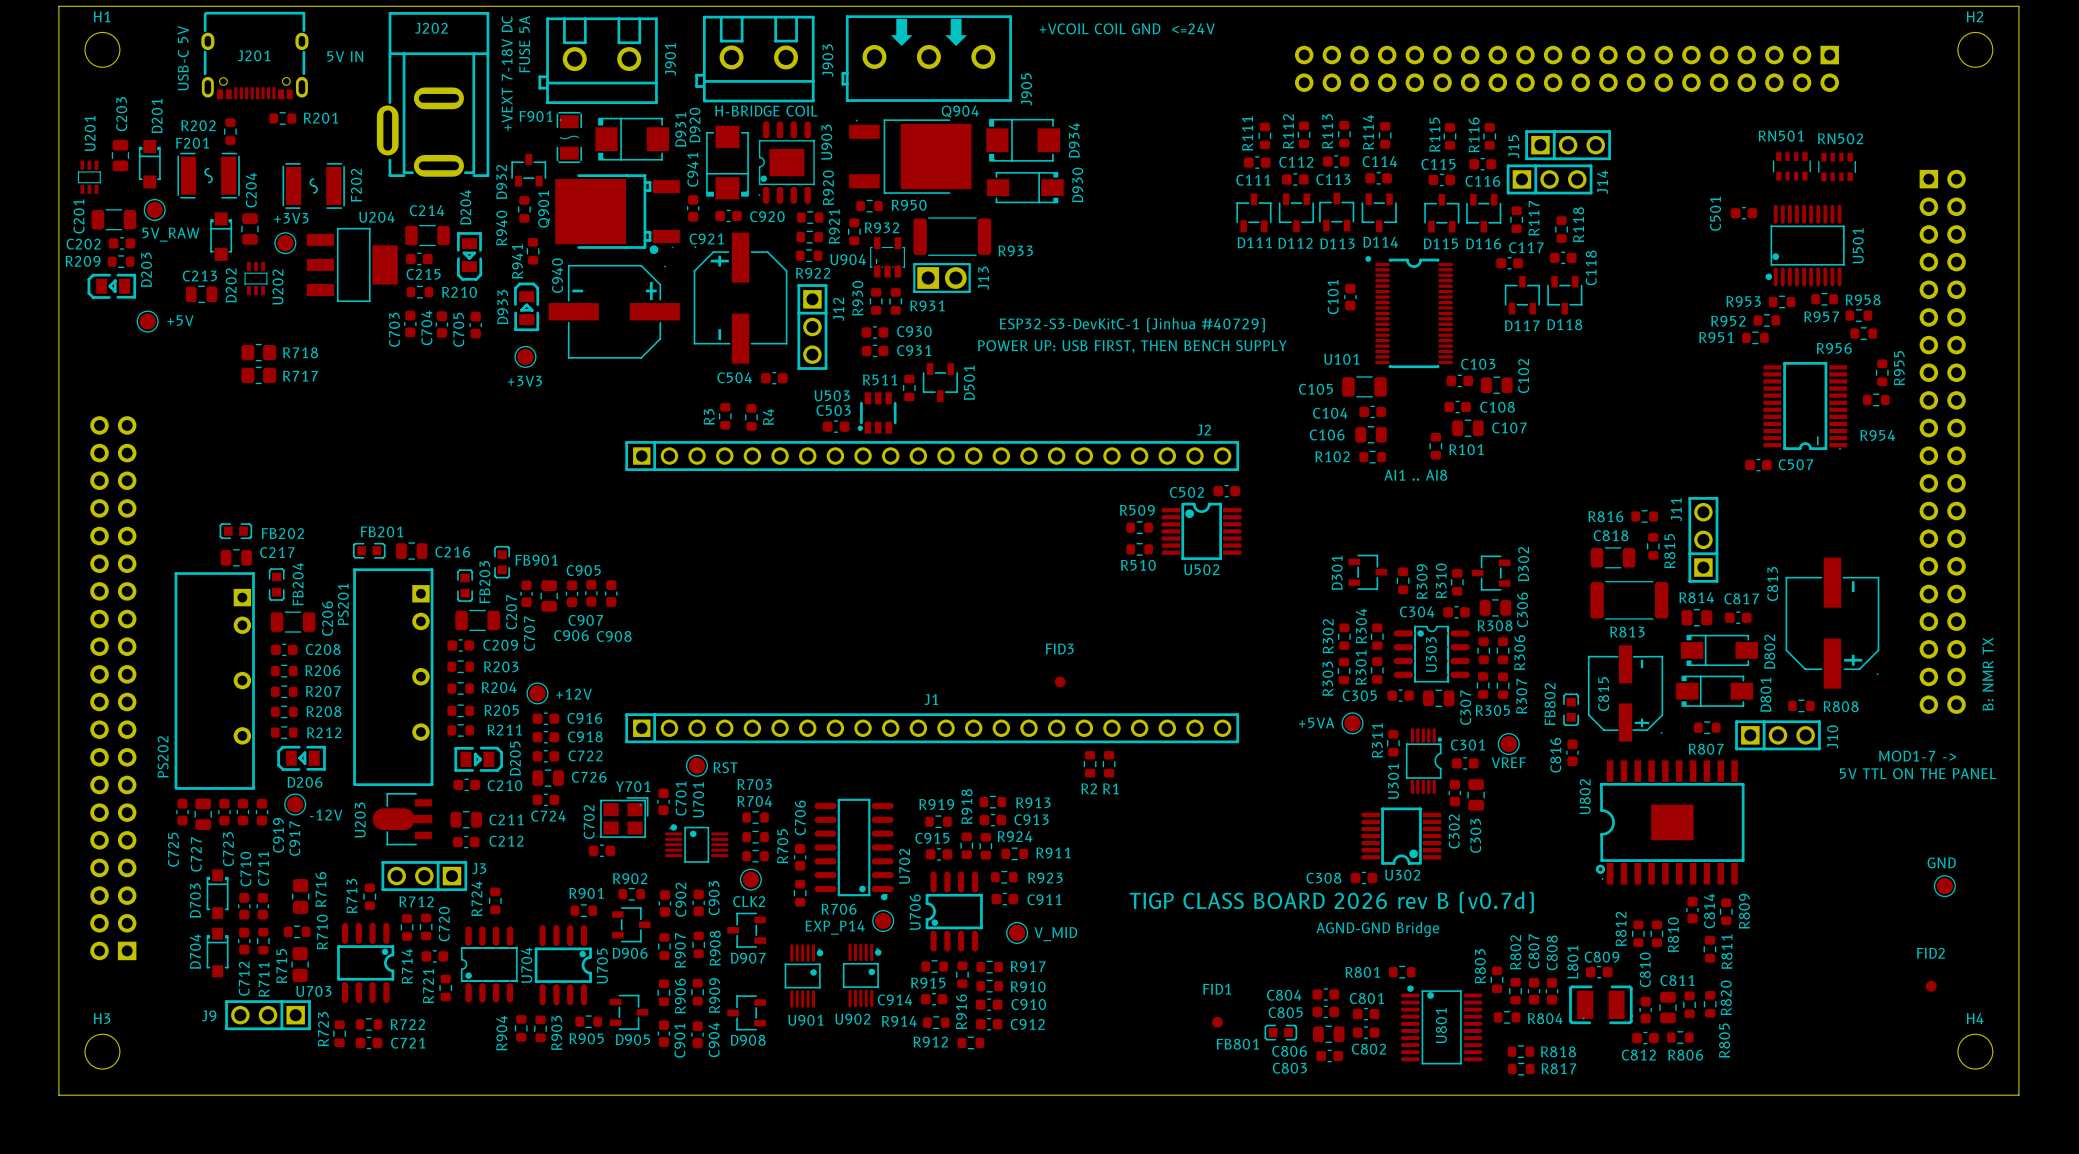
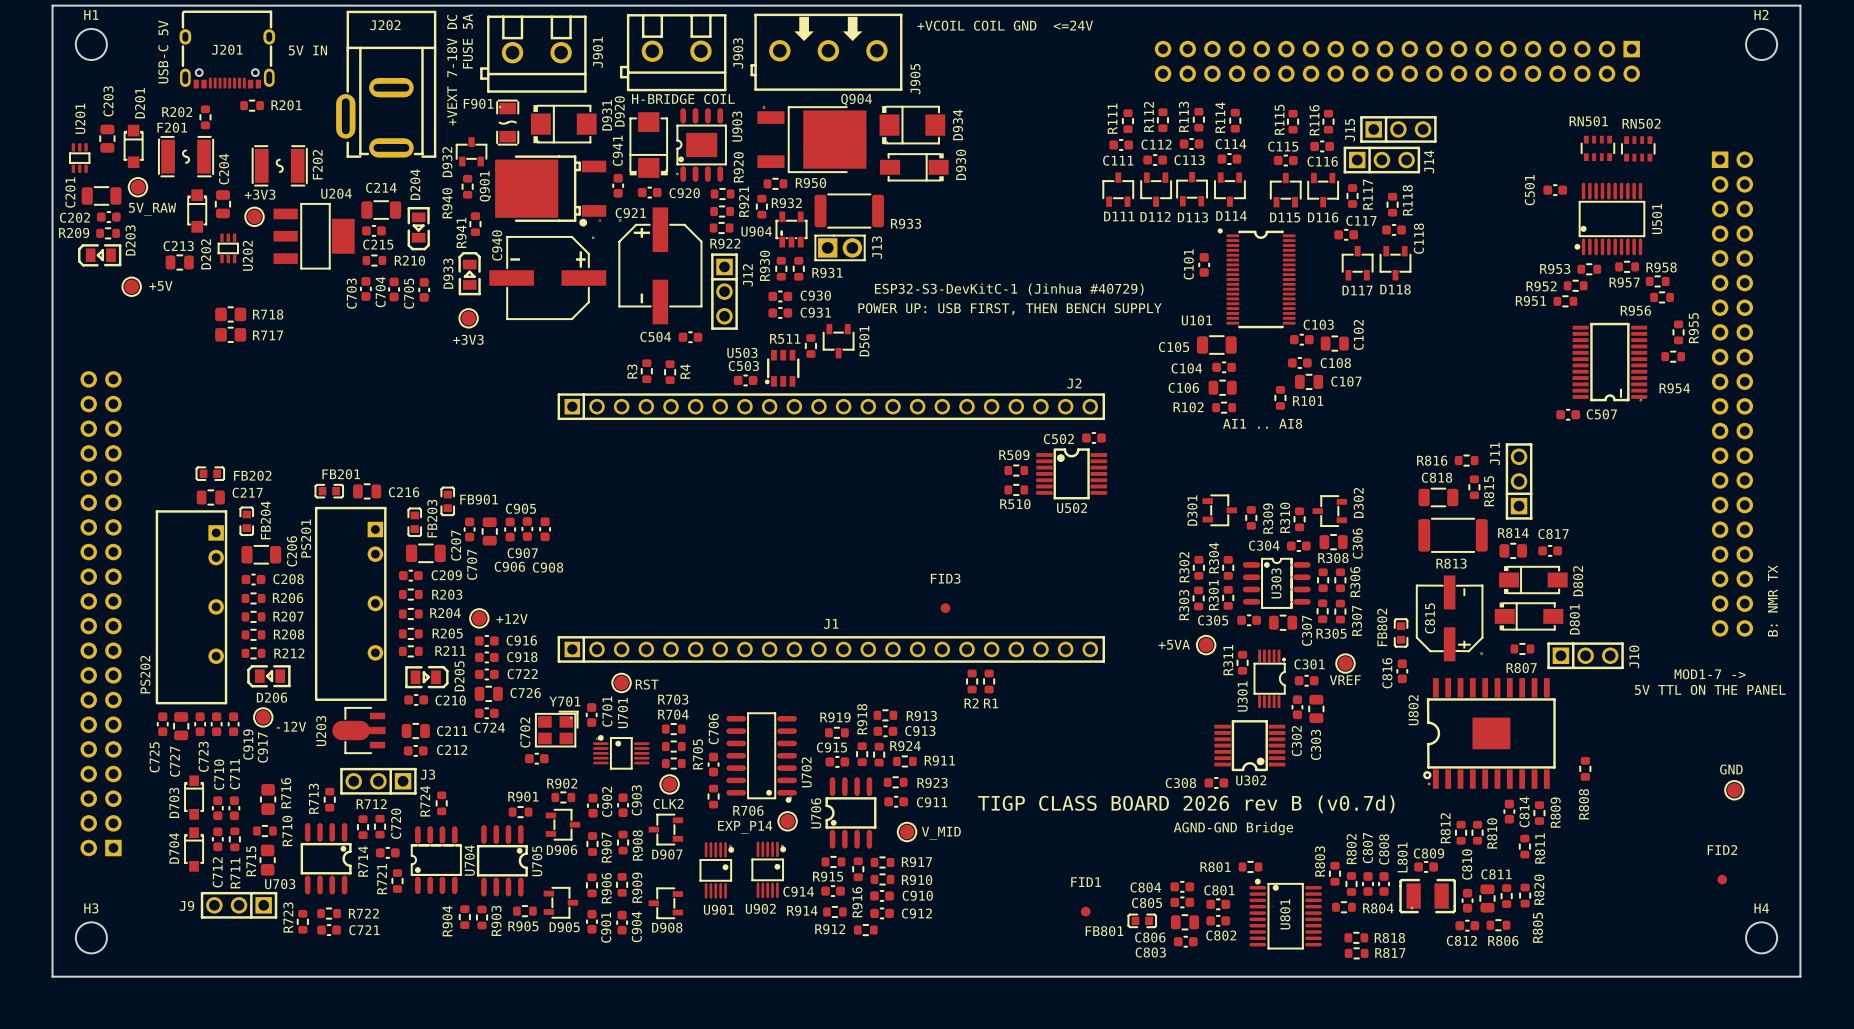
C813: (1832, 623) -> none
R808 rotation: 0° (1801, 705) -> 90° clockwise (1585, 768)
R808 position: (1801, 705) -> (1585, 768)

